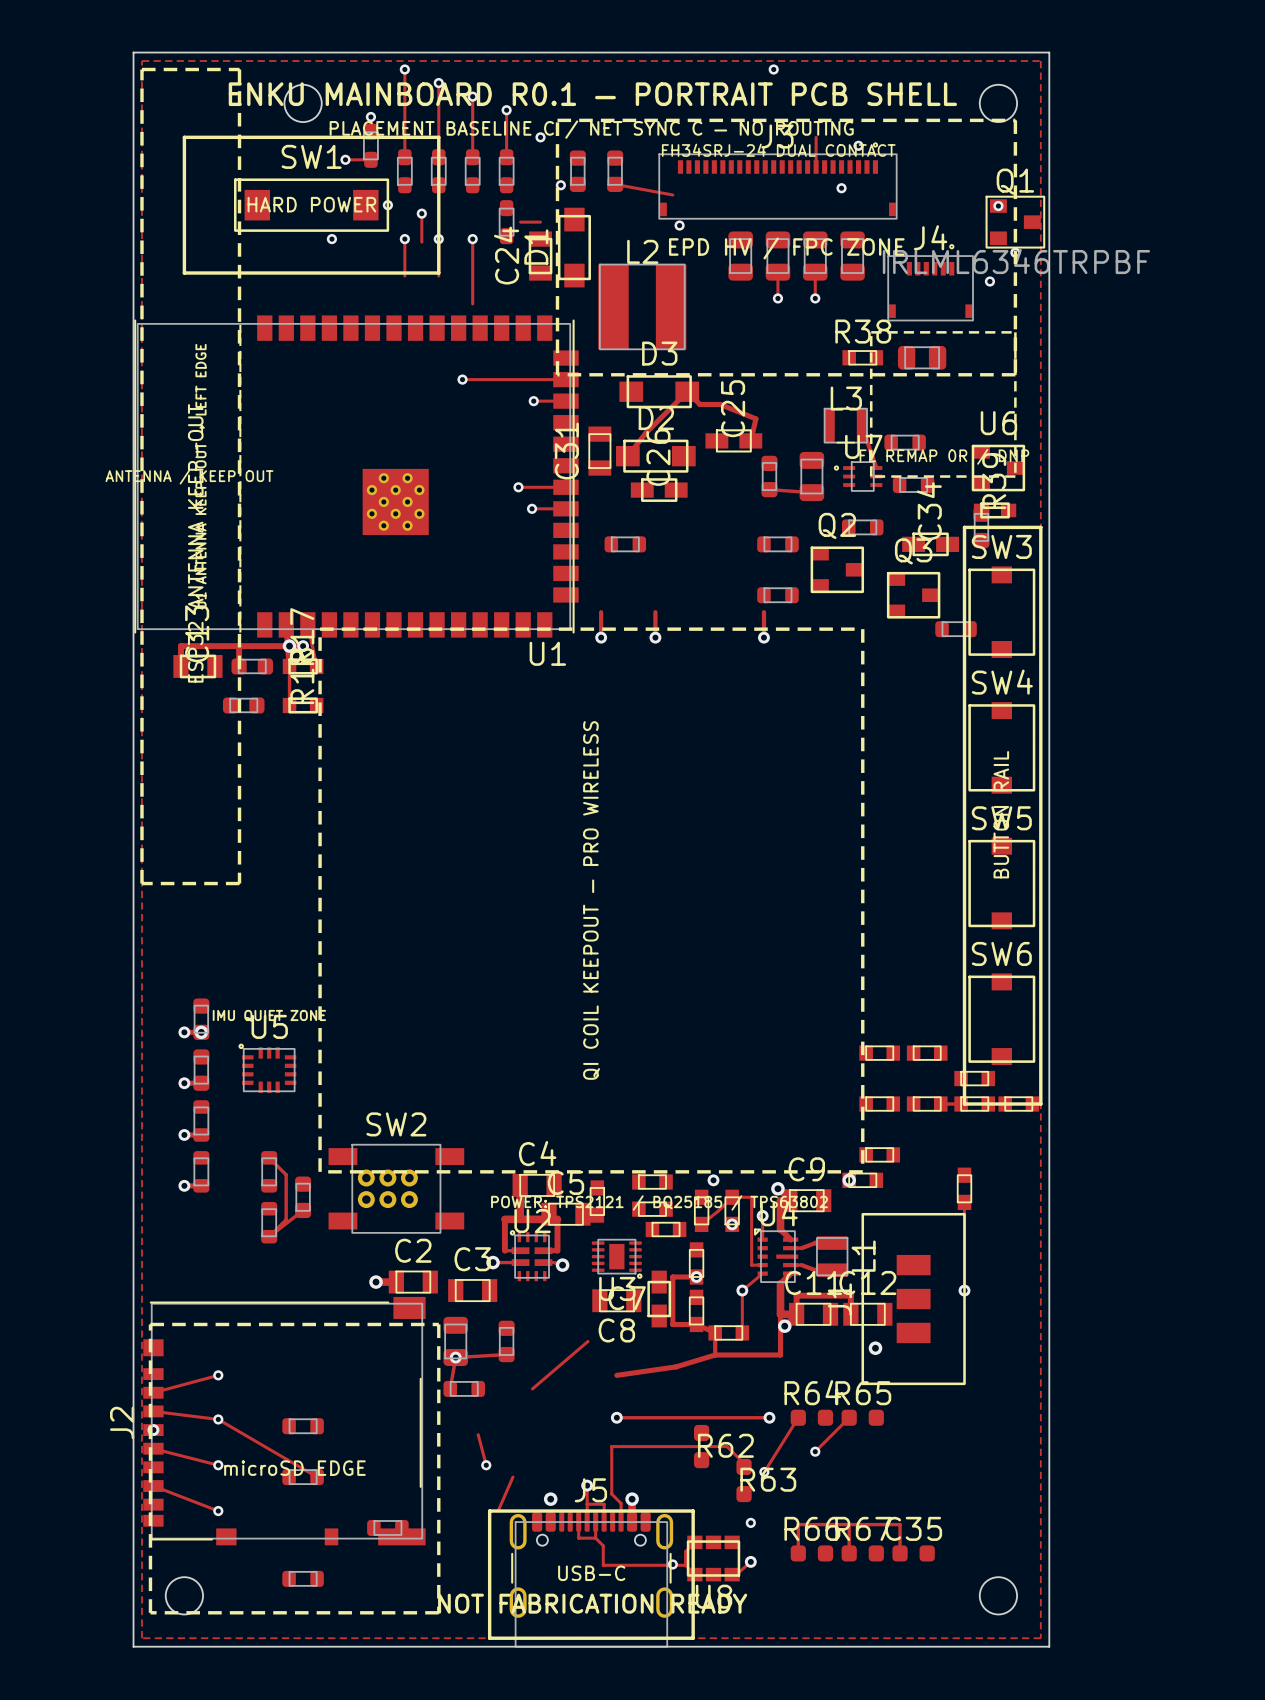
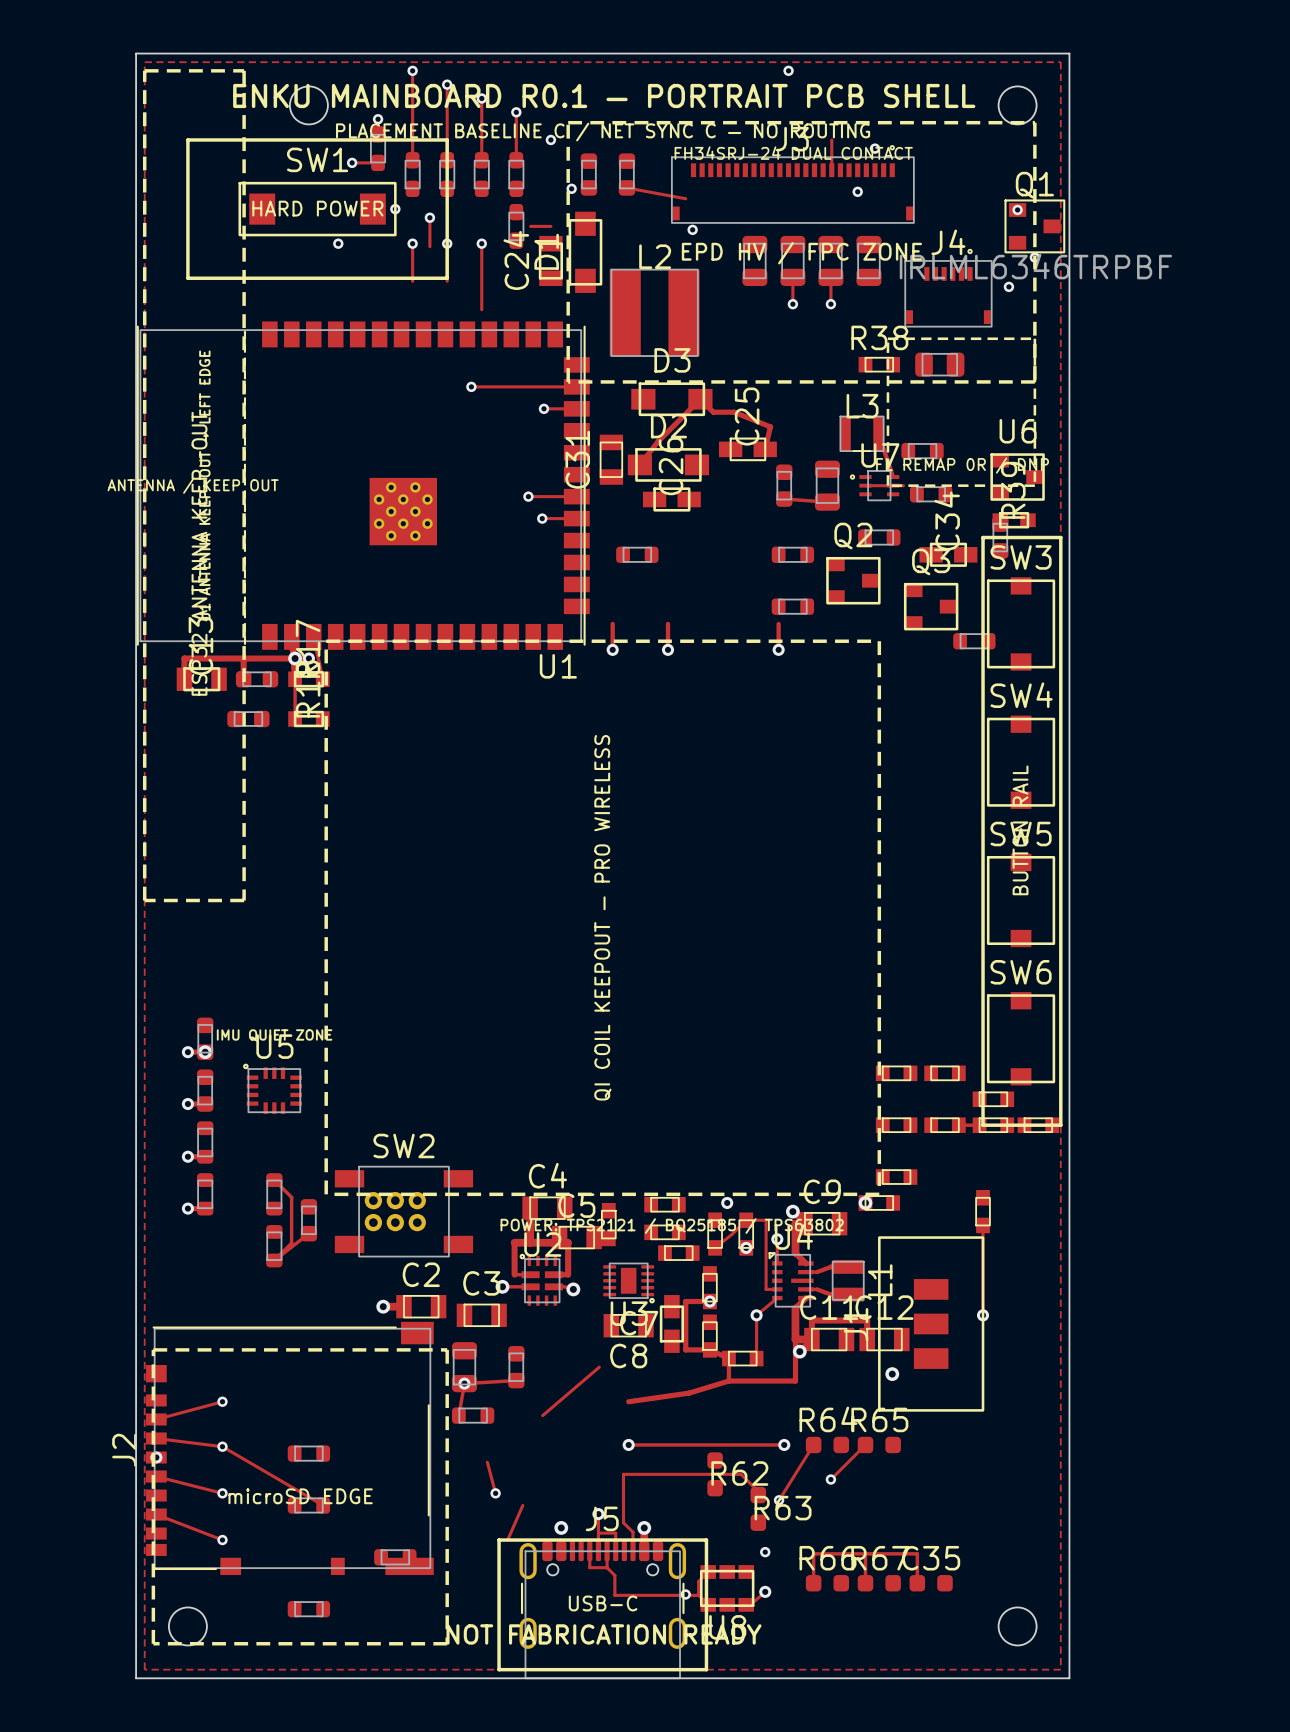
track: none -> (865, 485) (903, 485)

